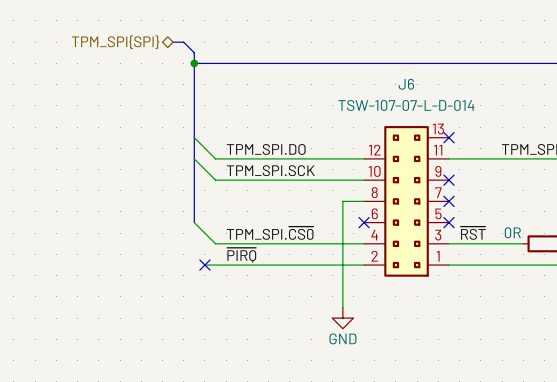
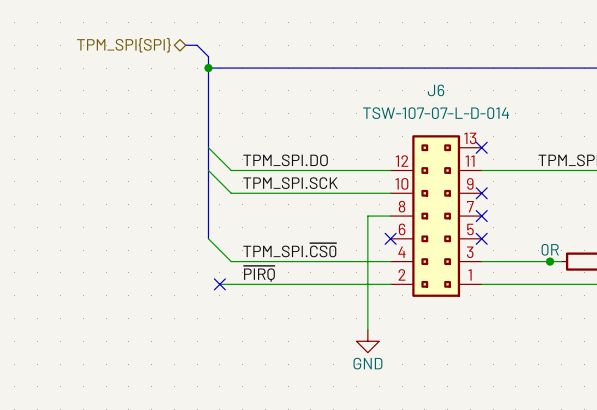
label: ~{RST} (473, 233) -> none
junction: none -> (550, 261)

